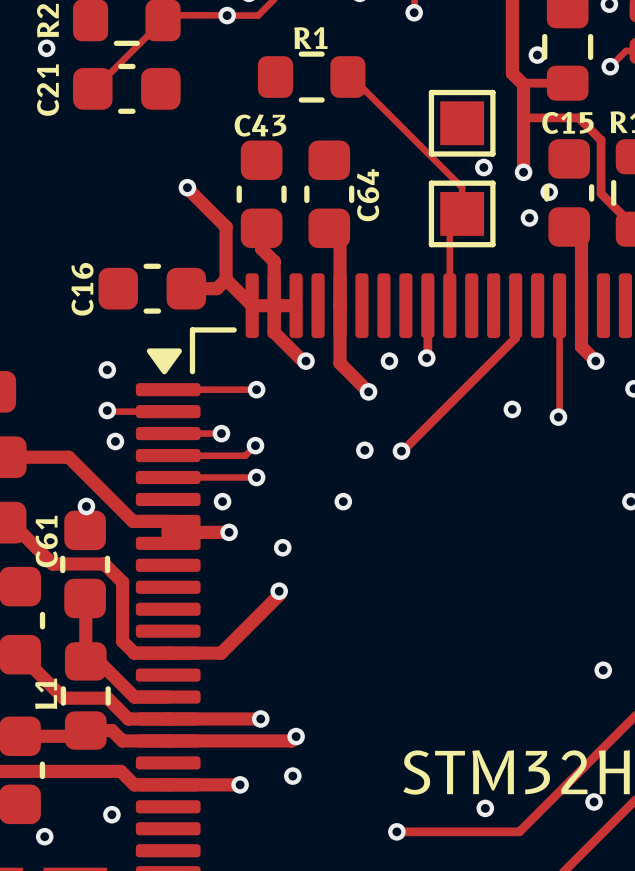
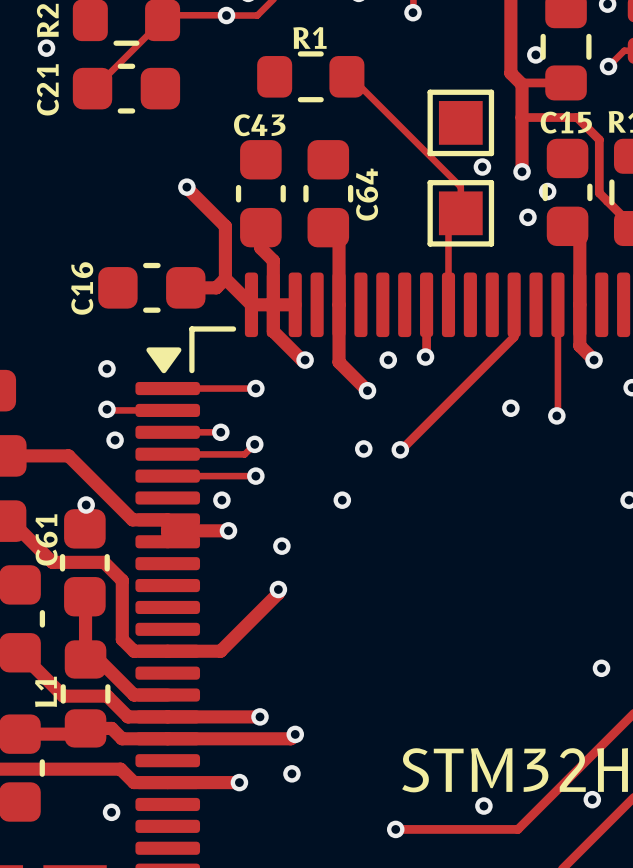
via: (44, 836) -> none

